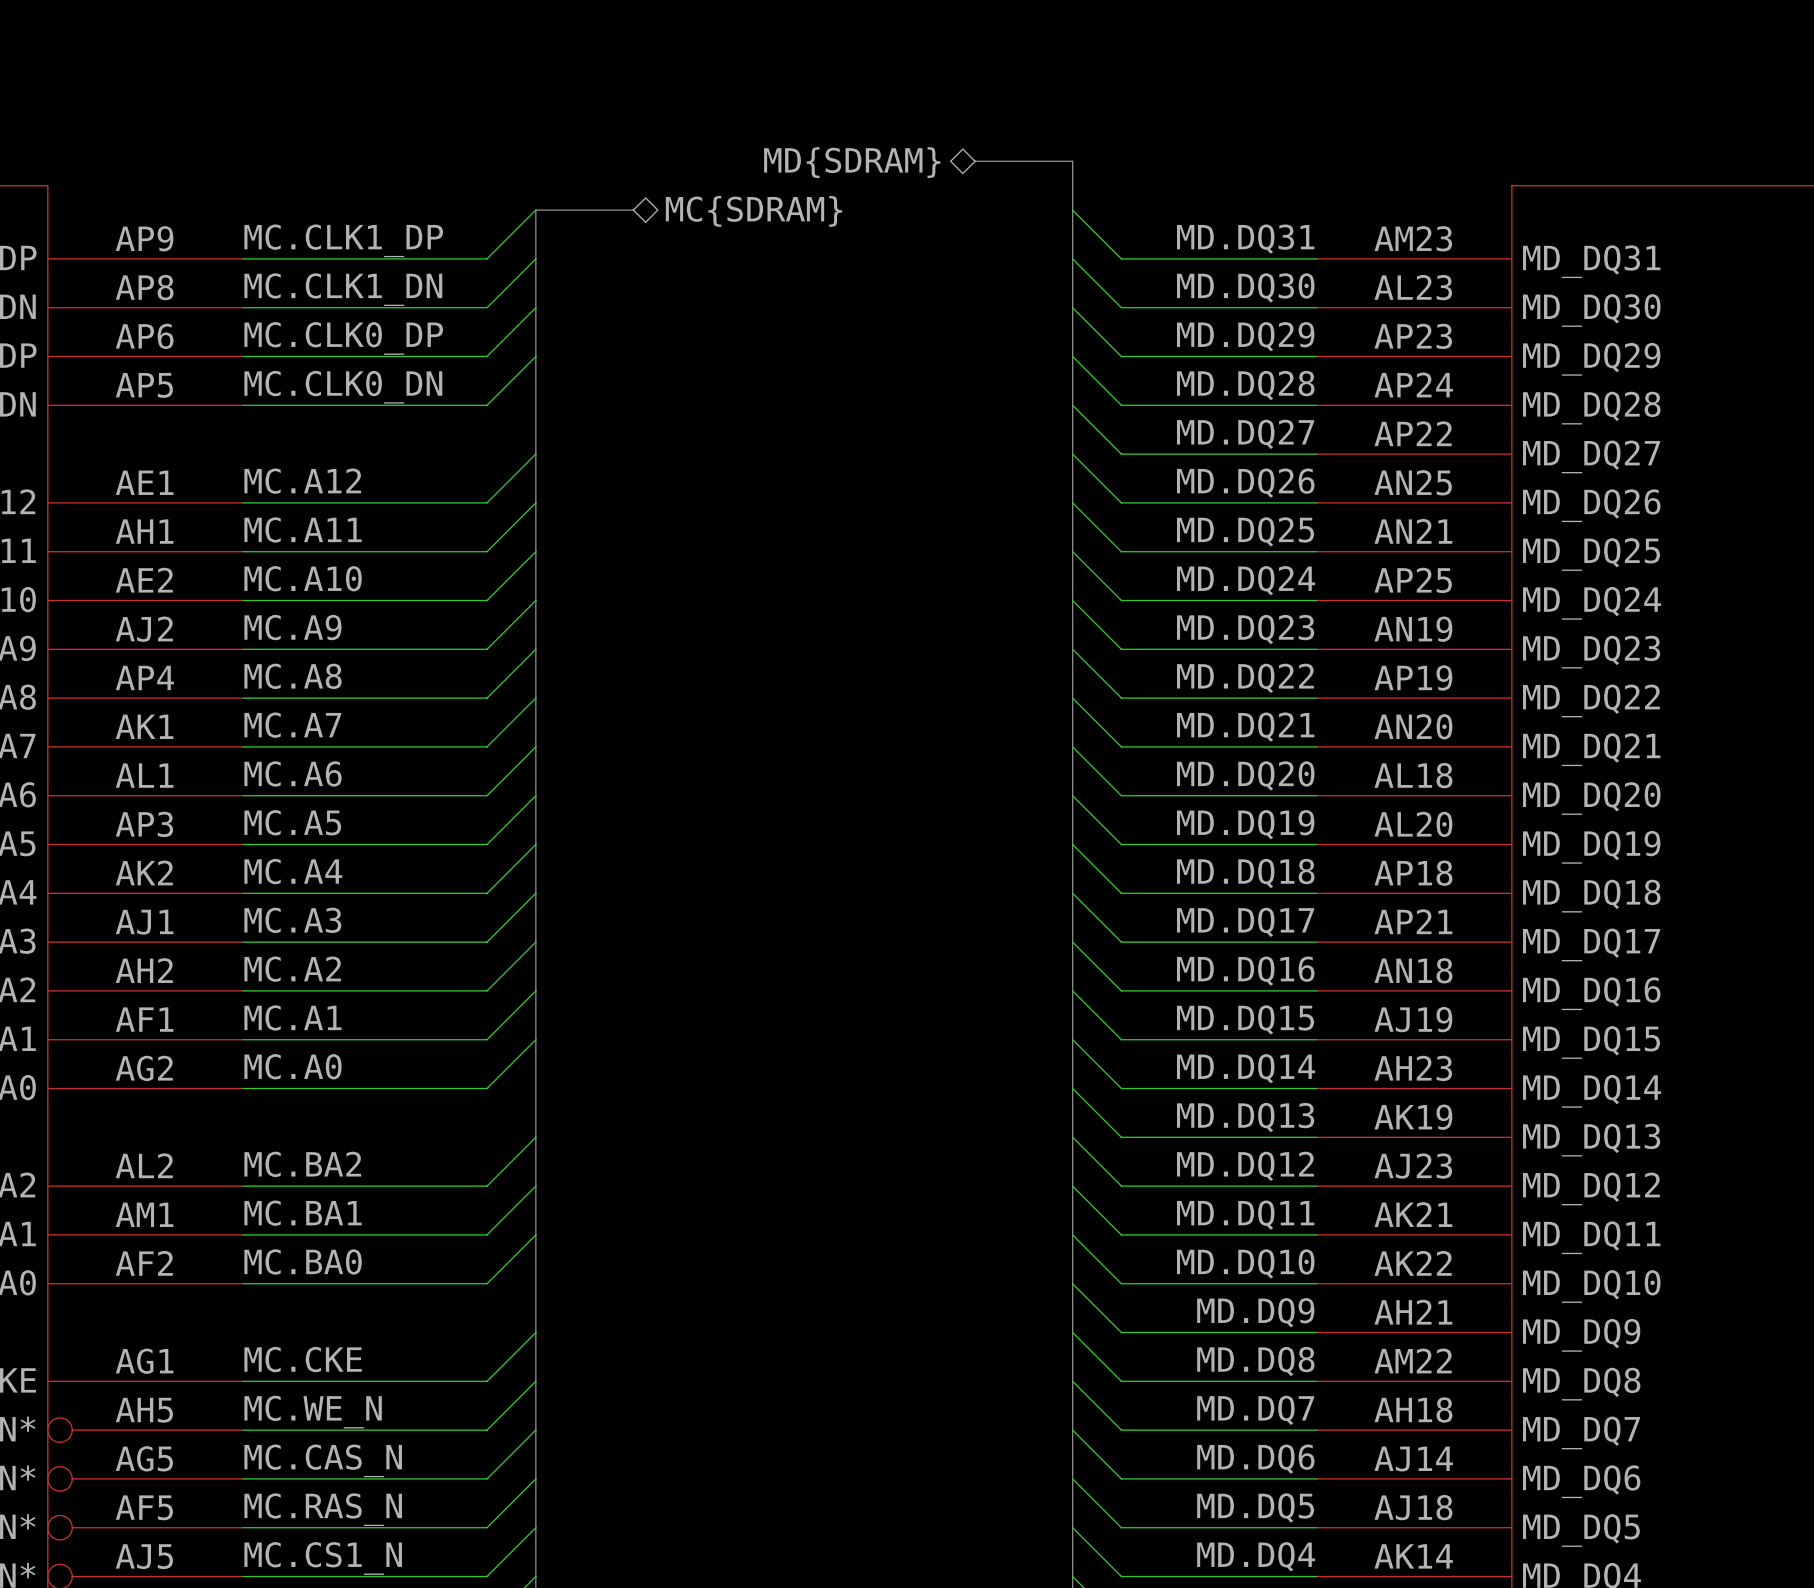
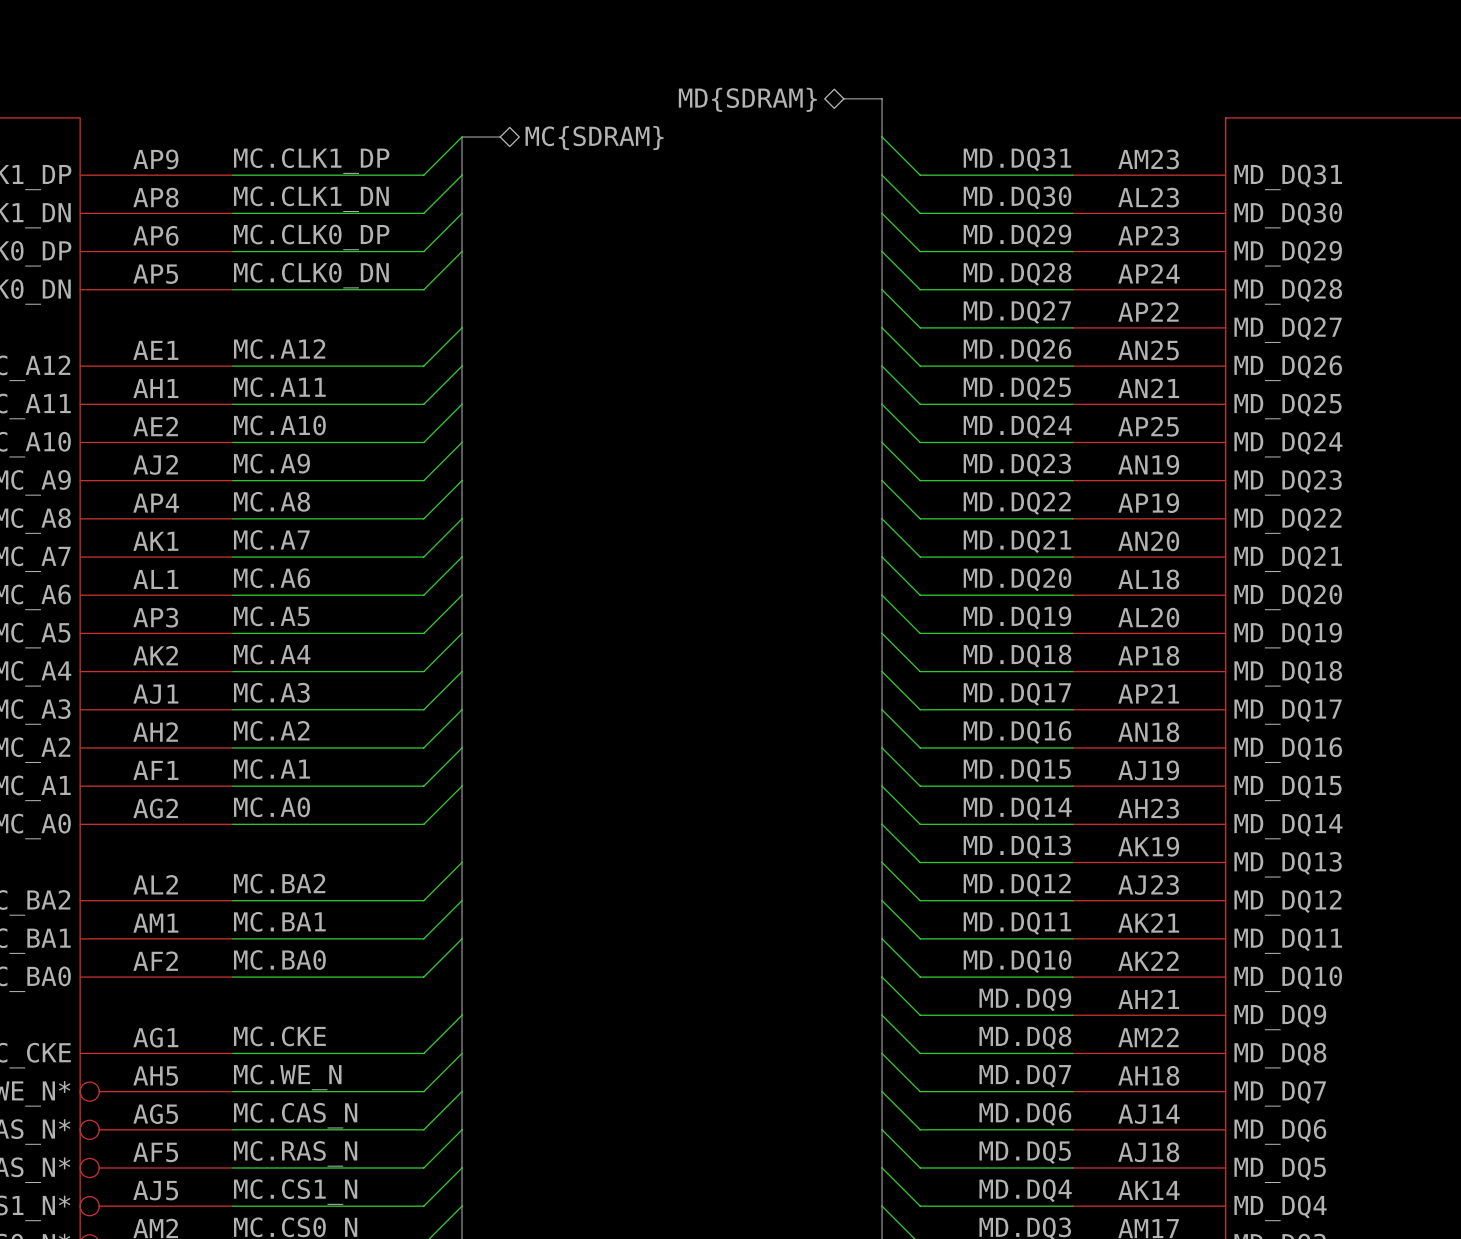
bus: (975, 161) (1023, 161) -> none
hierarchical label position: MD{SDRAM} (852, 162) -> MD{SDRAM} (747, 99)
bus: (584, 210) (633, 210) -> none
hierarchical label position: MC{SDRAM} (754, 211) -> MC{SDRAM} (594, 138)

